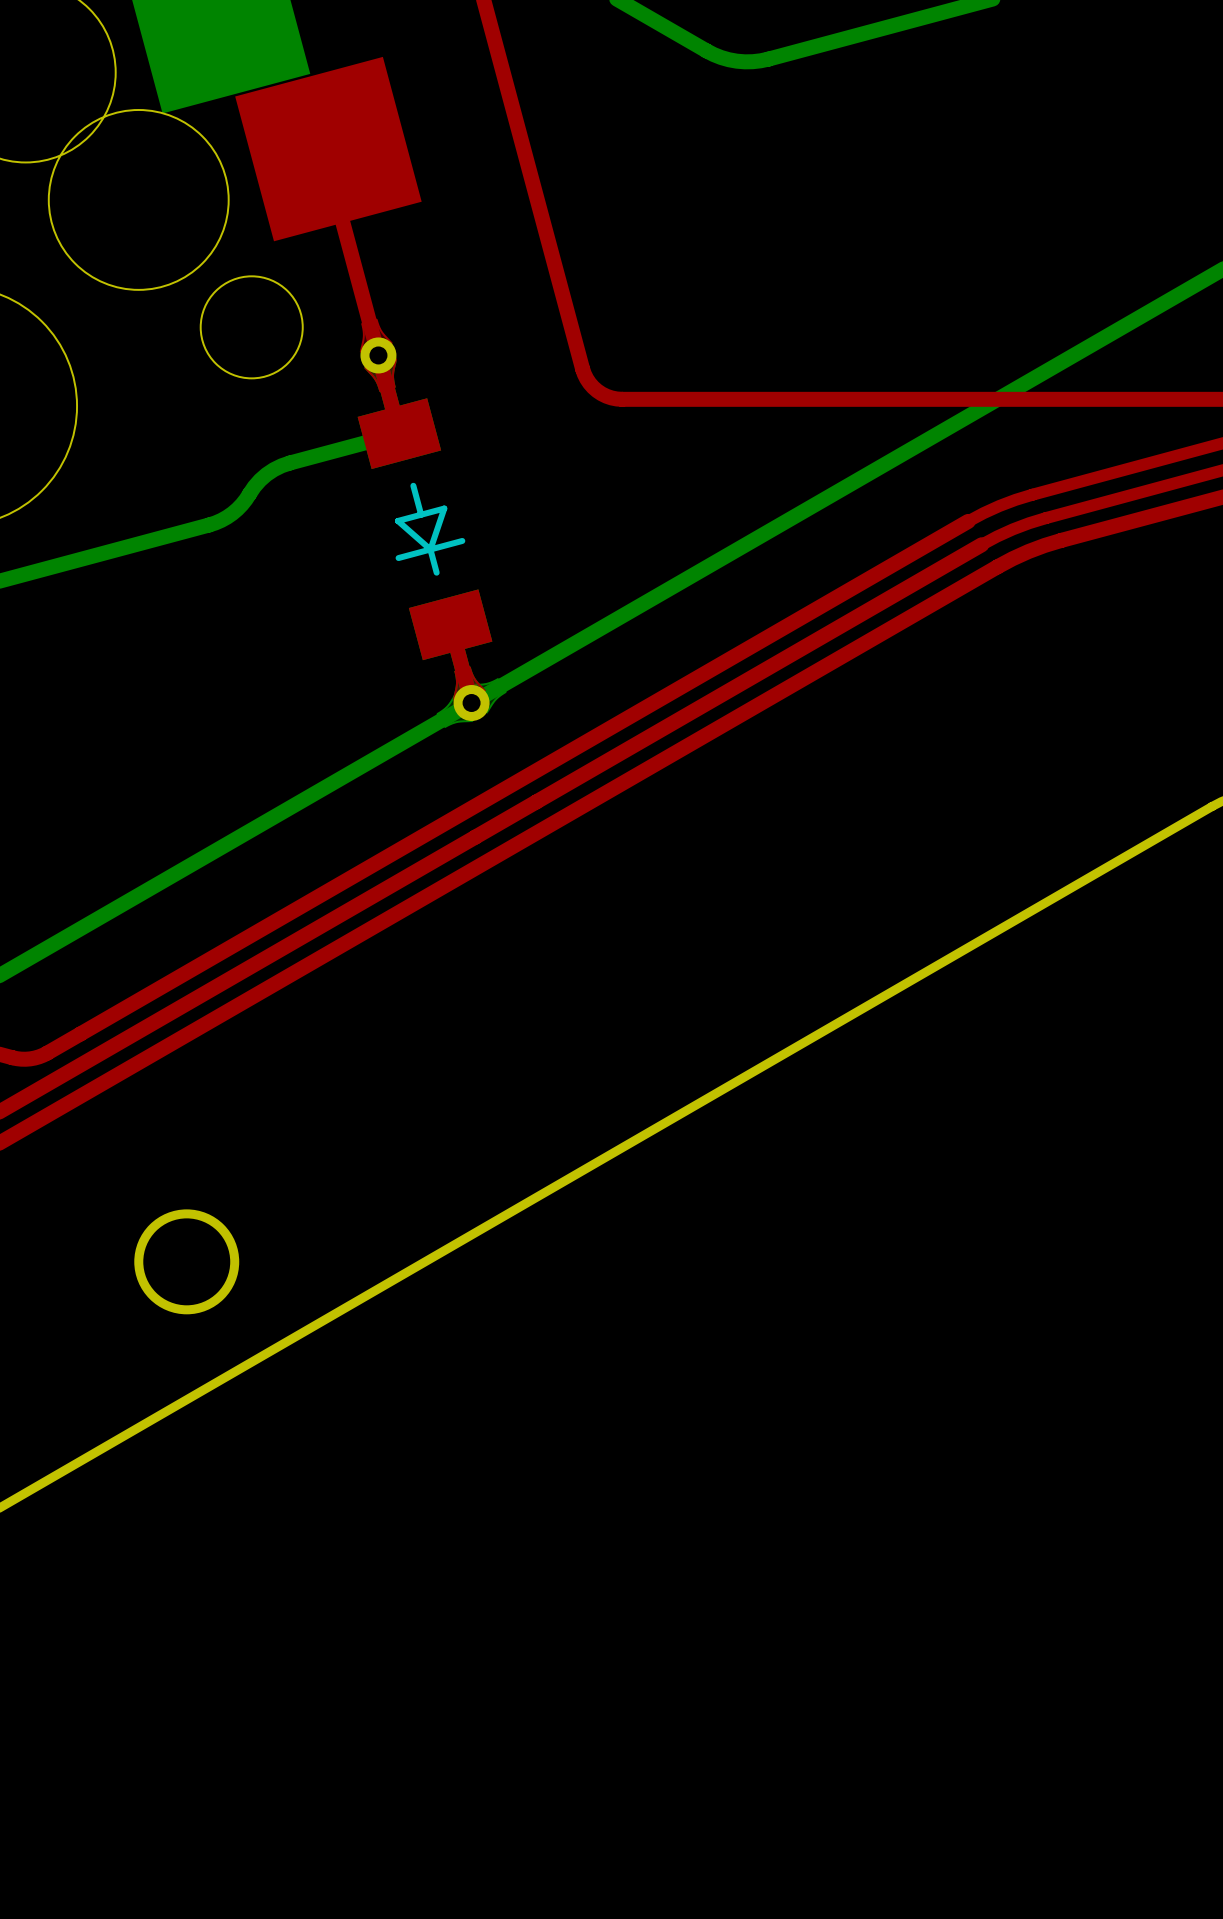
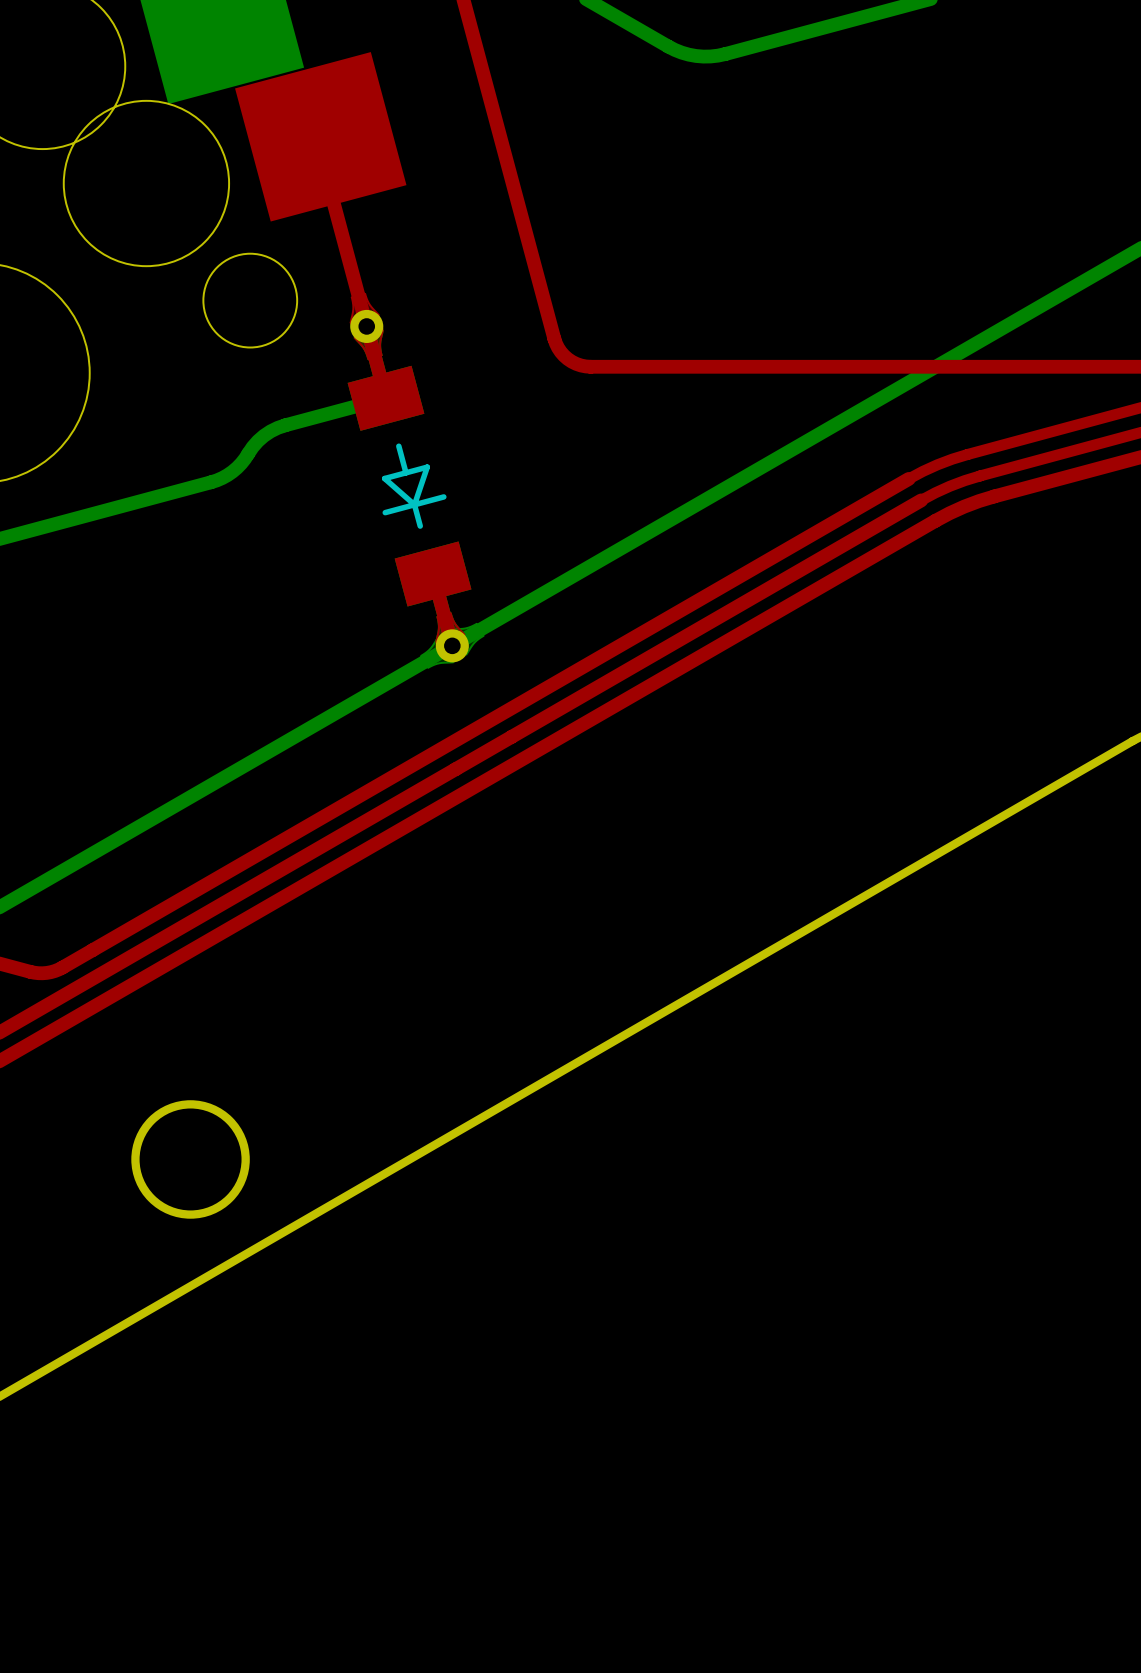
round board edge size: [134, 1209, 240, 1315] -> [131, 1100, 250, 1219]

